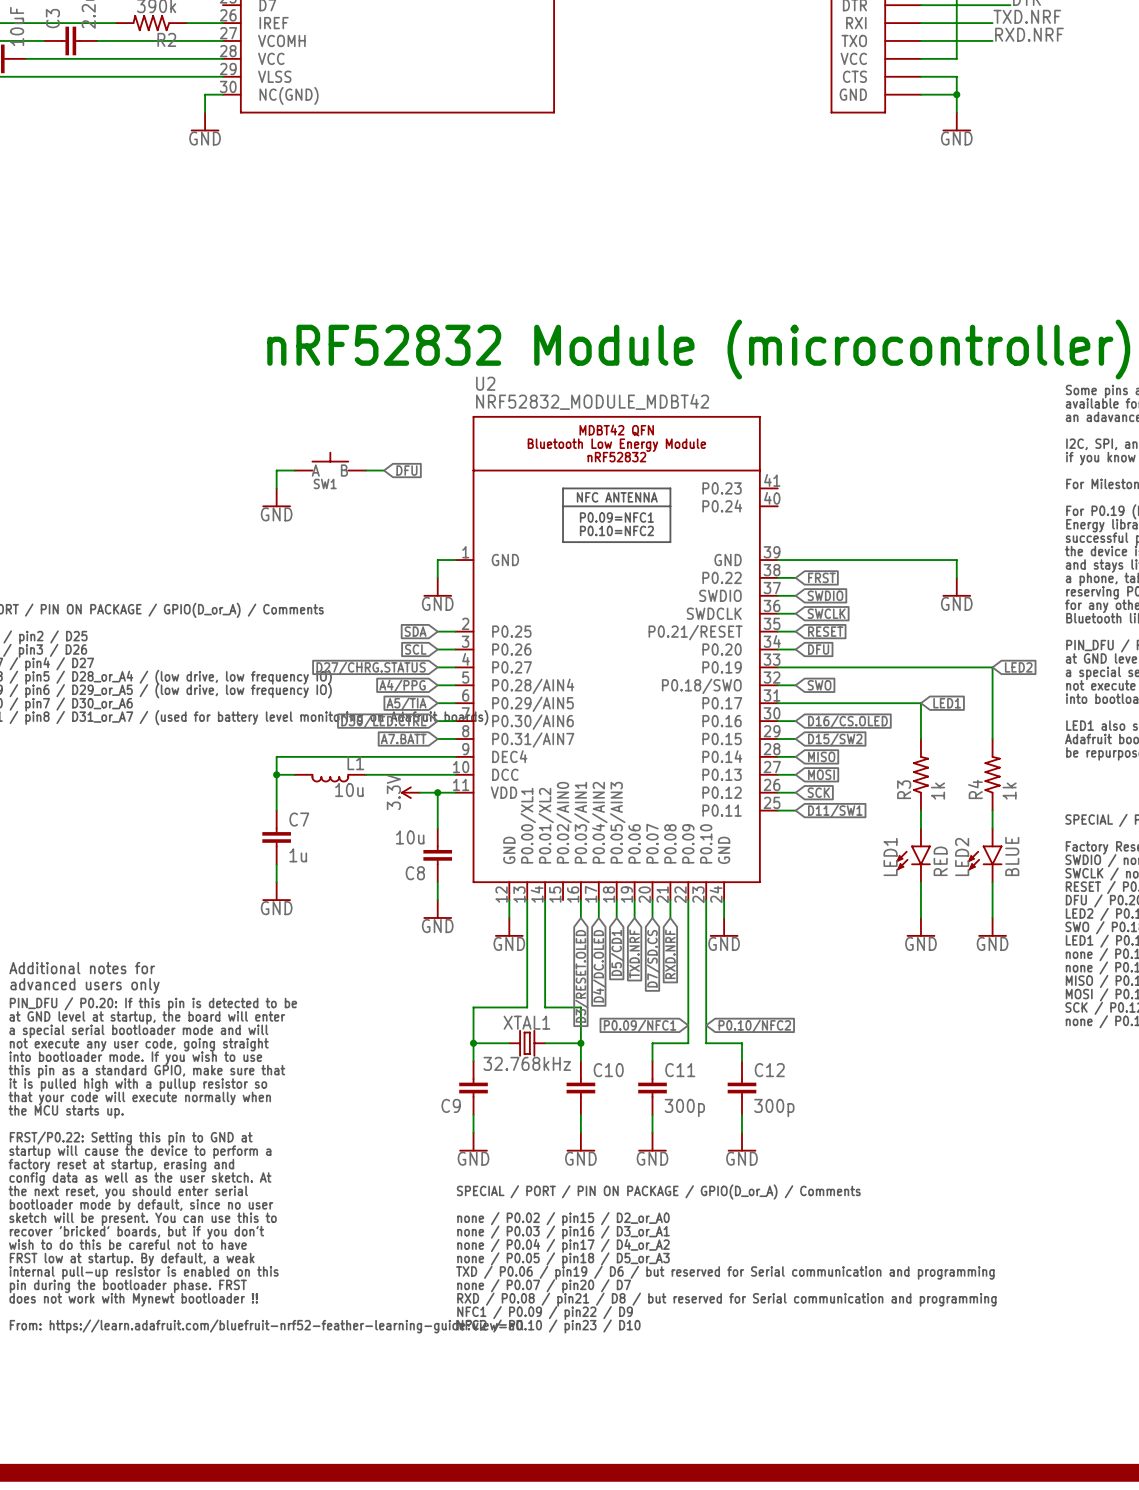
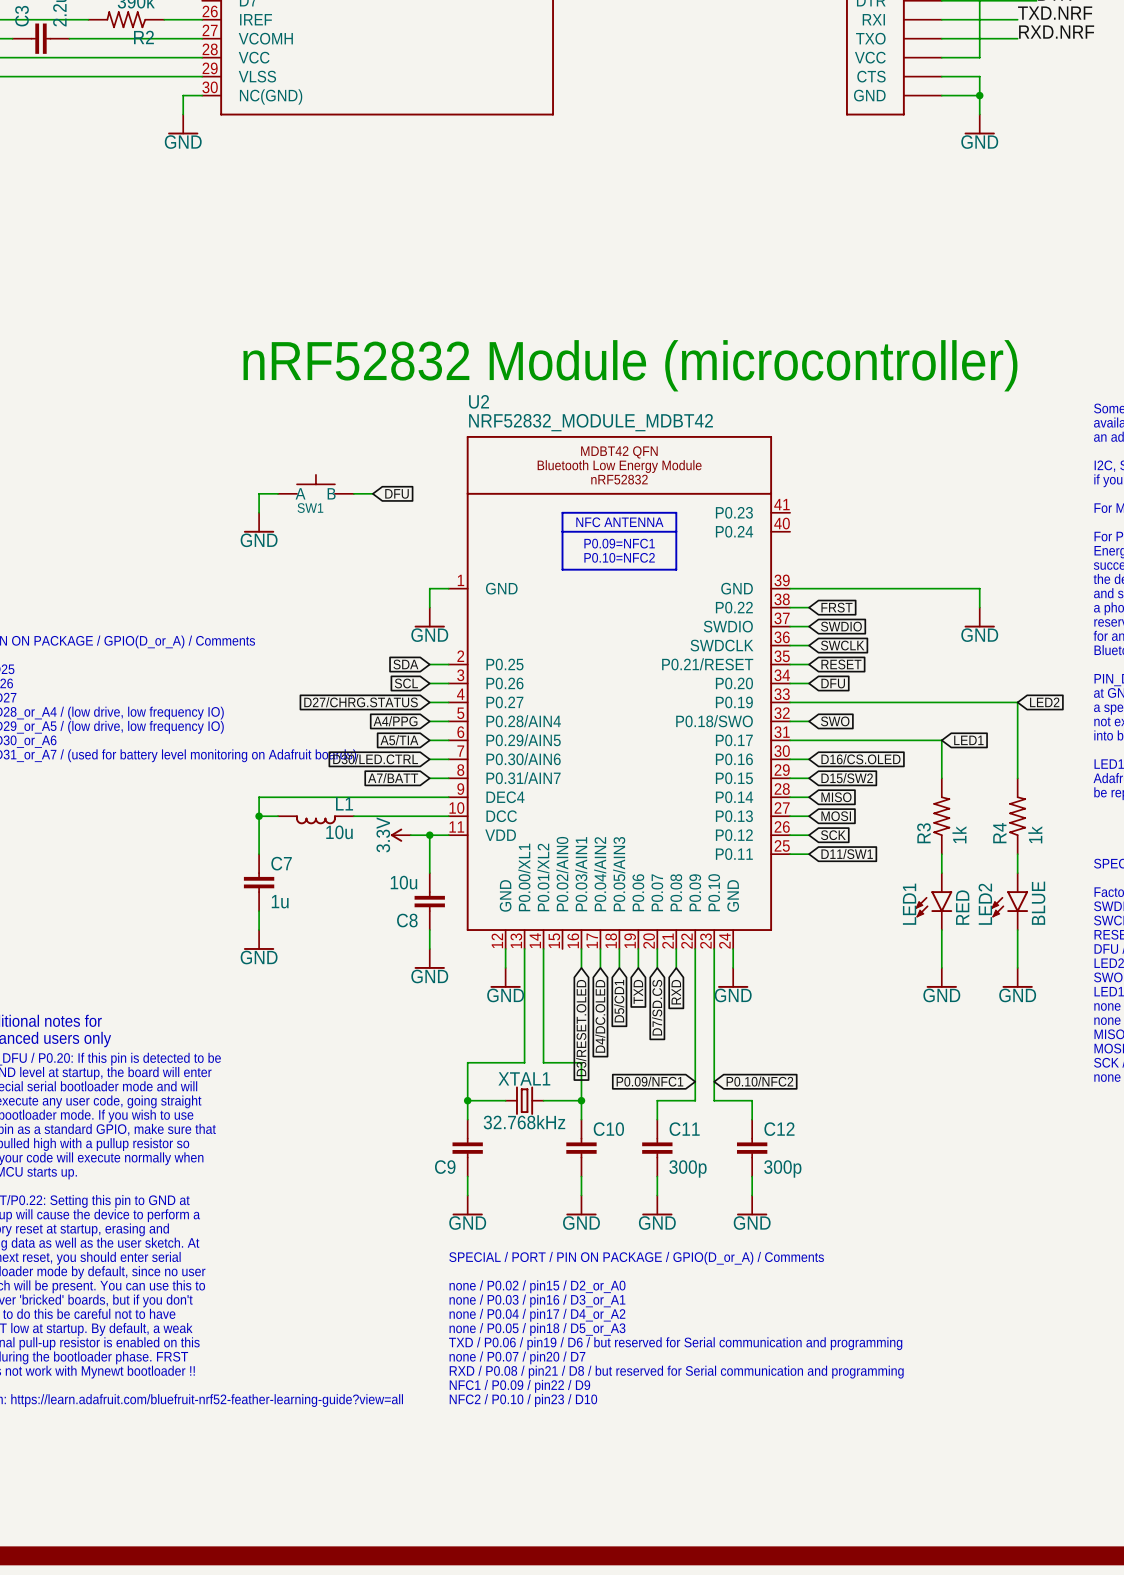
global label: A7.BATT (403, 739) -> A7/BATT (393, 778)
global label: TXD.NRF (634, 953) -> TXD (638, 991)
global label: RXD.NRF (670, 954) -> RXD (676, 992)

